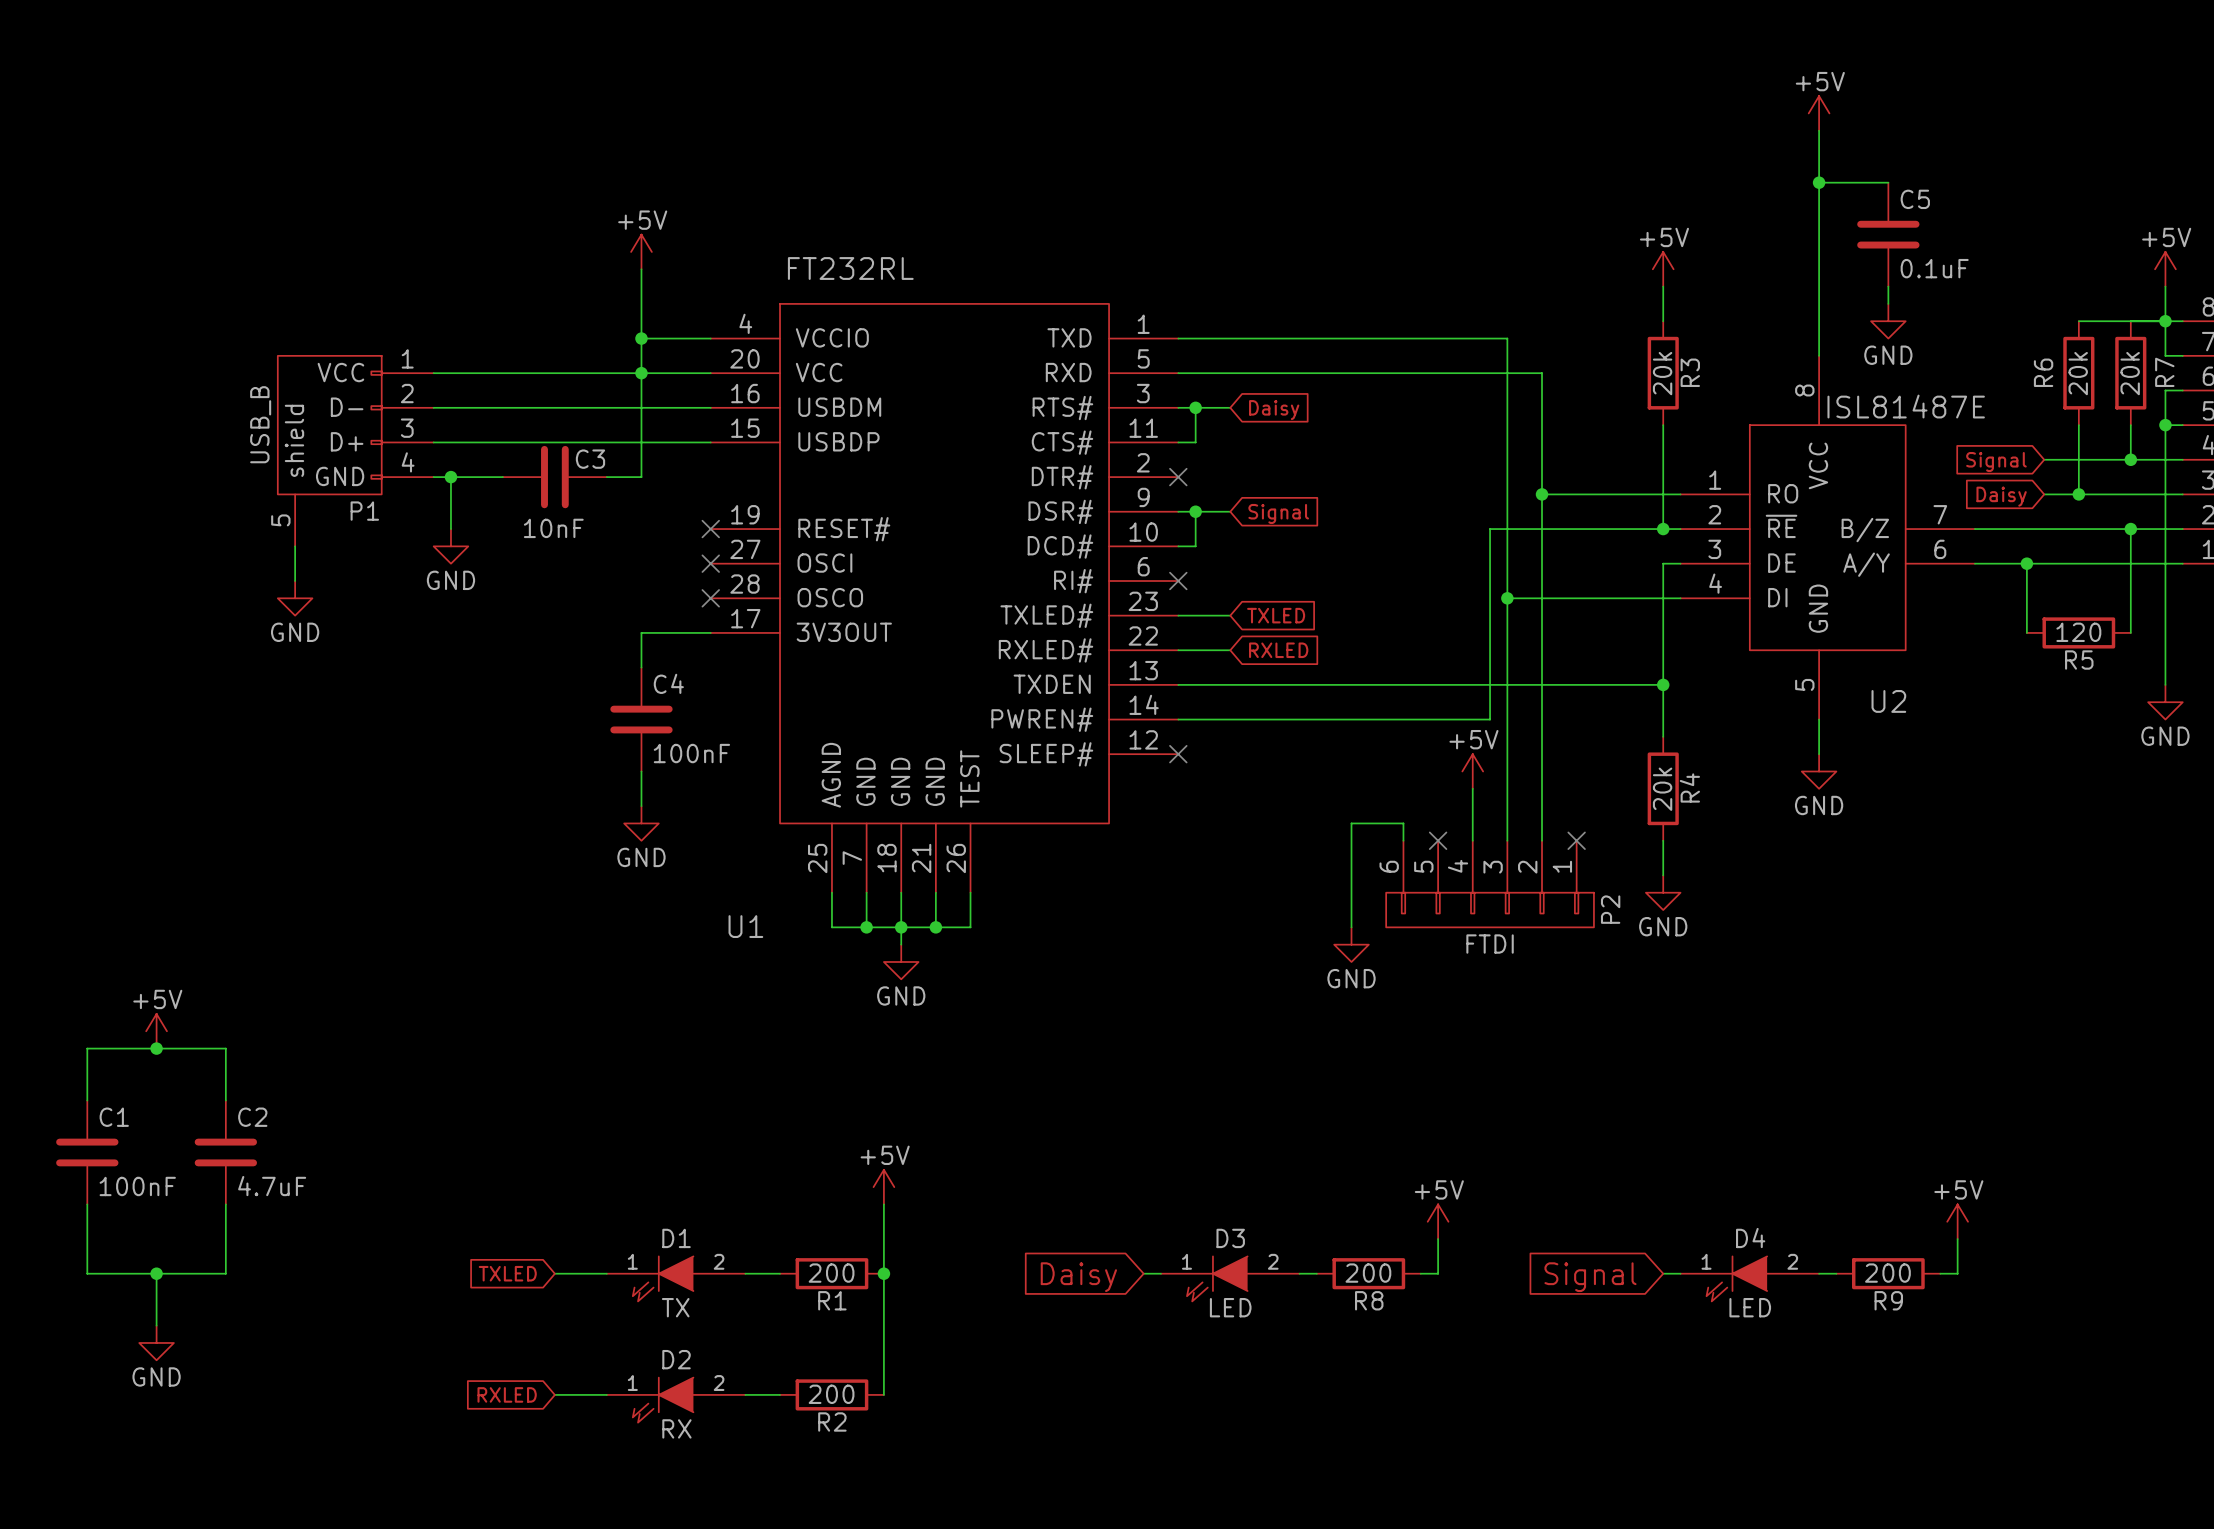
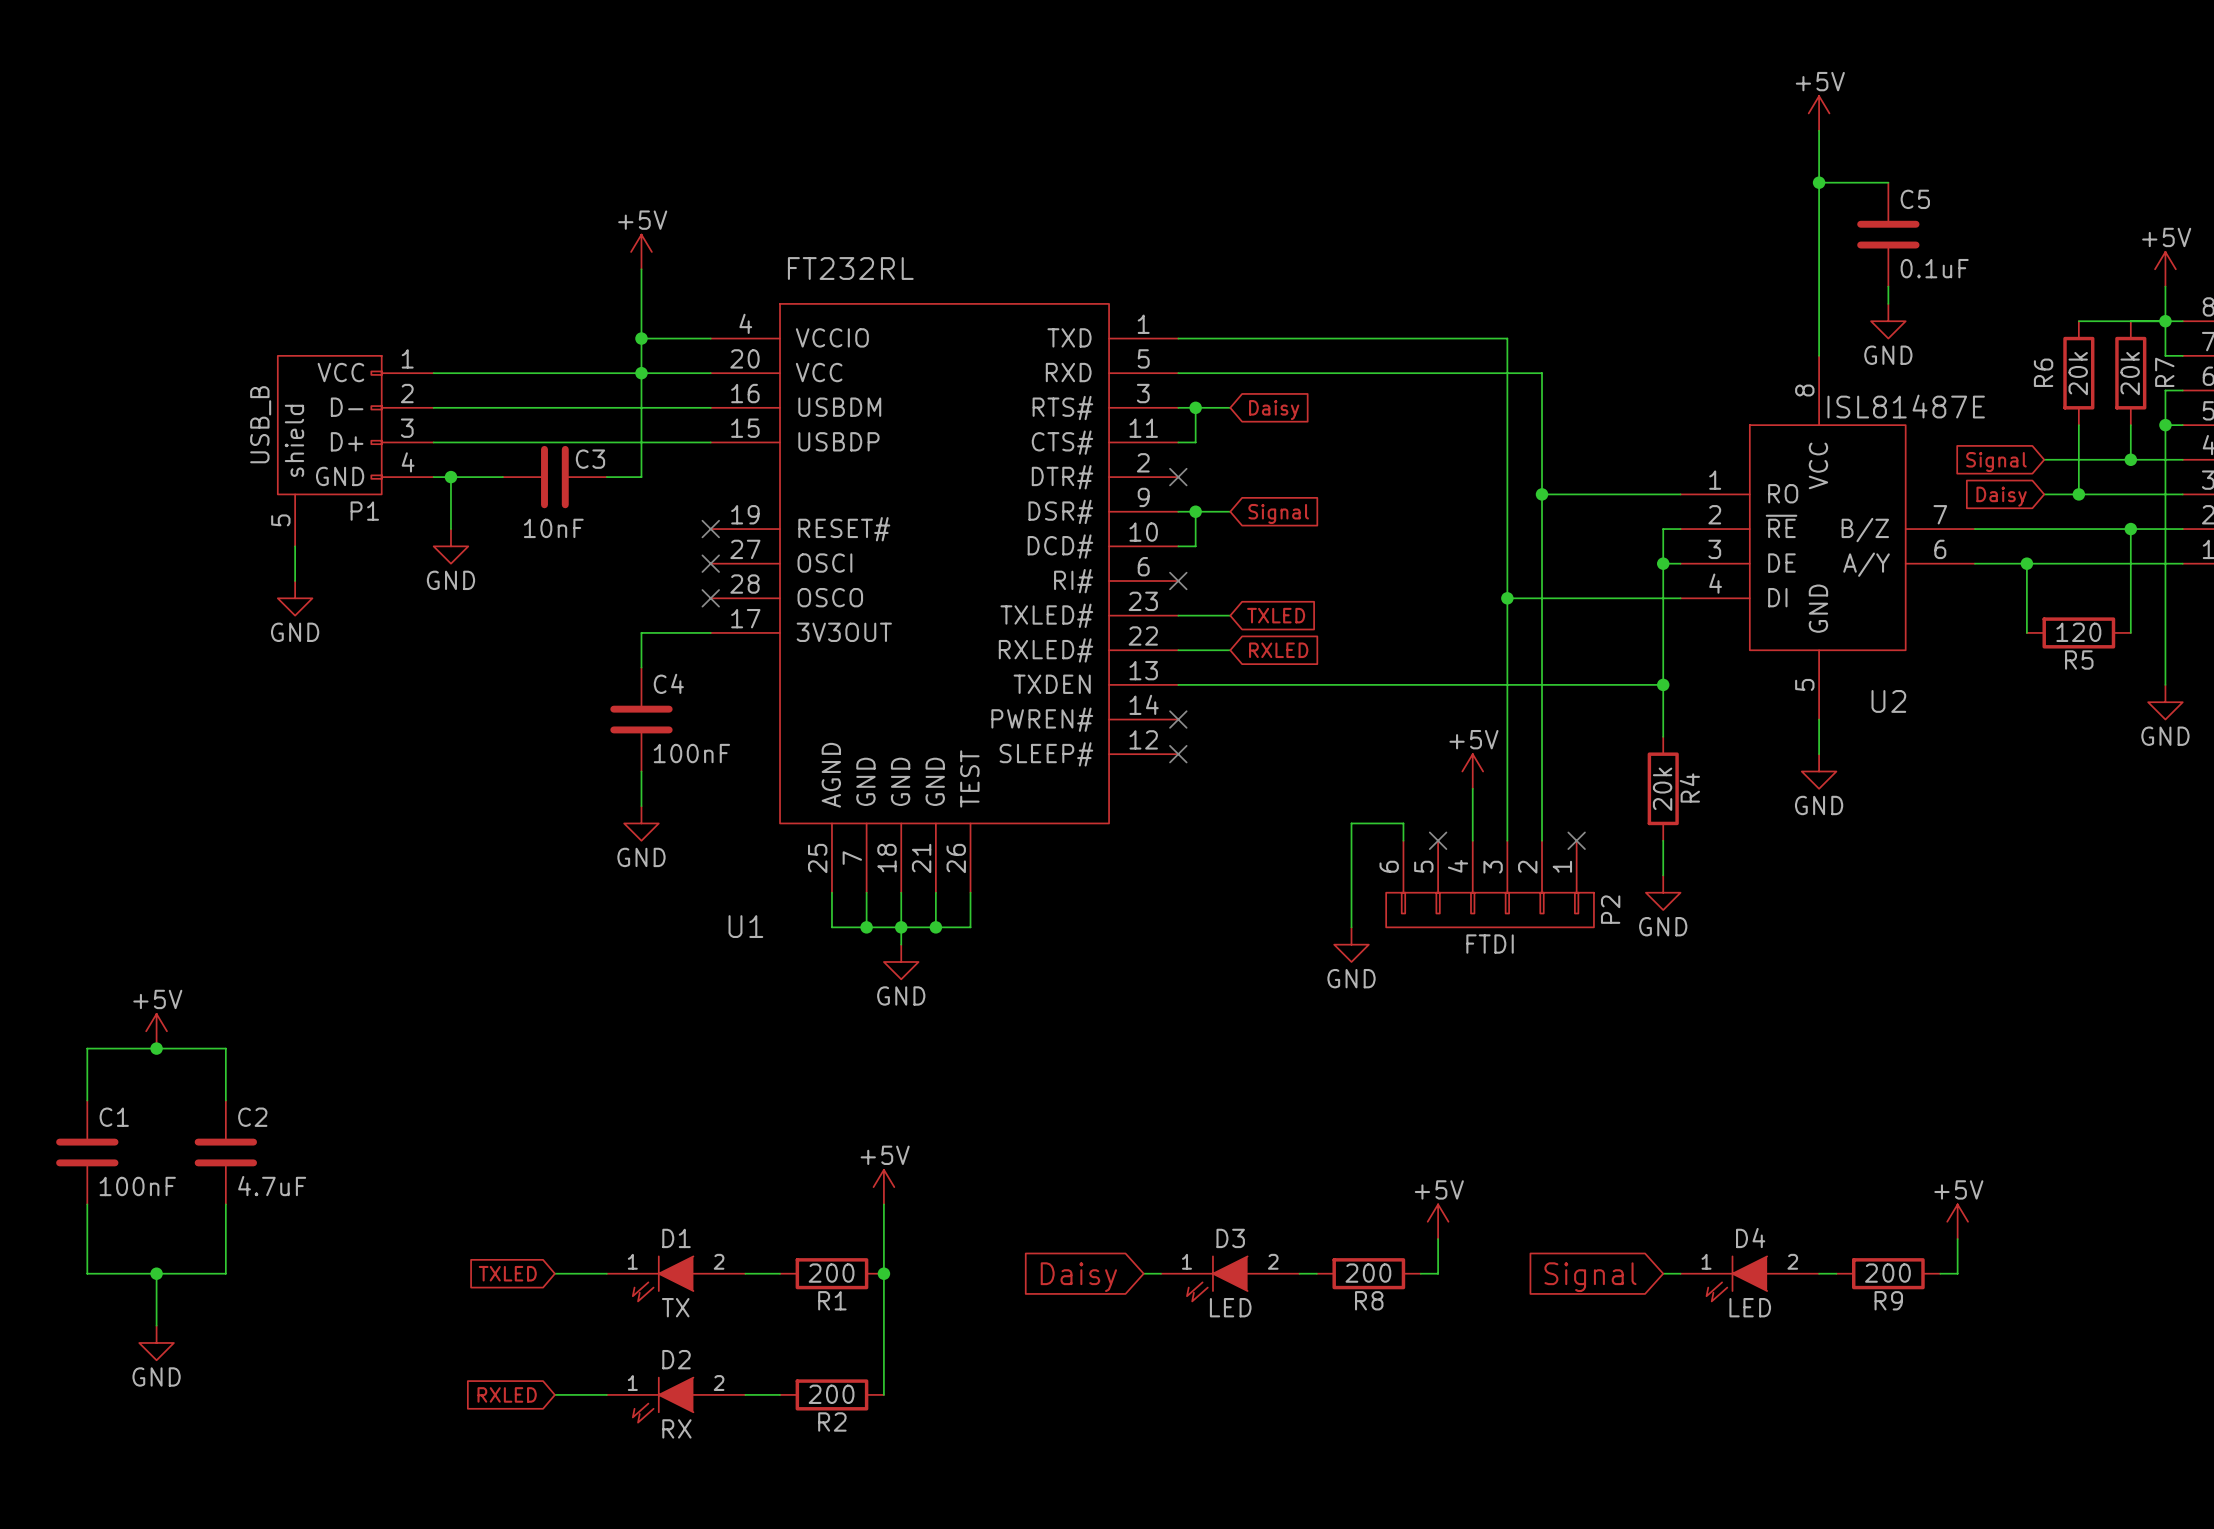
power symbol: +5V (1663, 269) -> none
wire: (1663, 286) (1663, 321) -> (1663, 529) (1663, 563)
R3: 20k (1663, 373) -> none
wire: (1663, 425) (1663, 529) (1490, 529) (1490, 719) (1178, 719) -> none
junction position: (1663, 529) -> (1663, 563)
no-connect mark: none -> (1178, 719)

